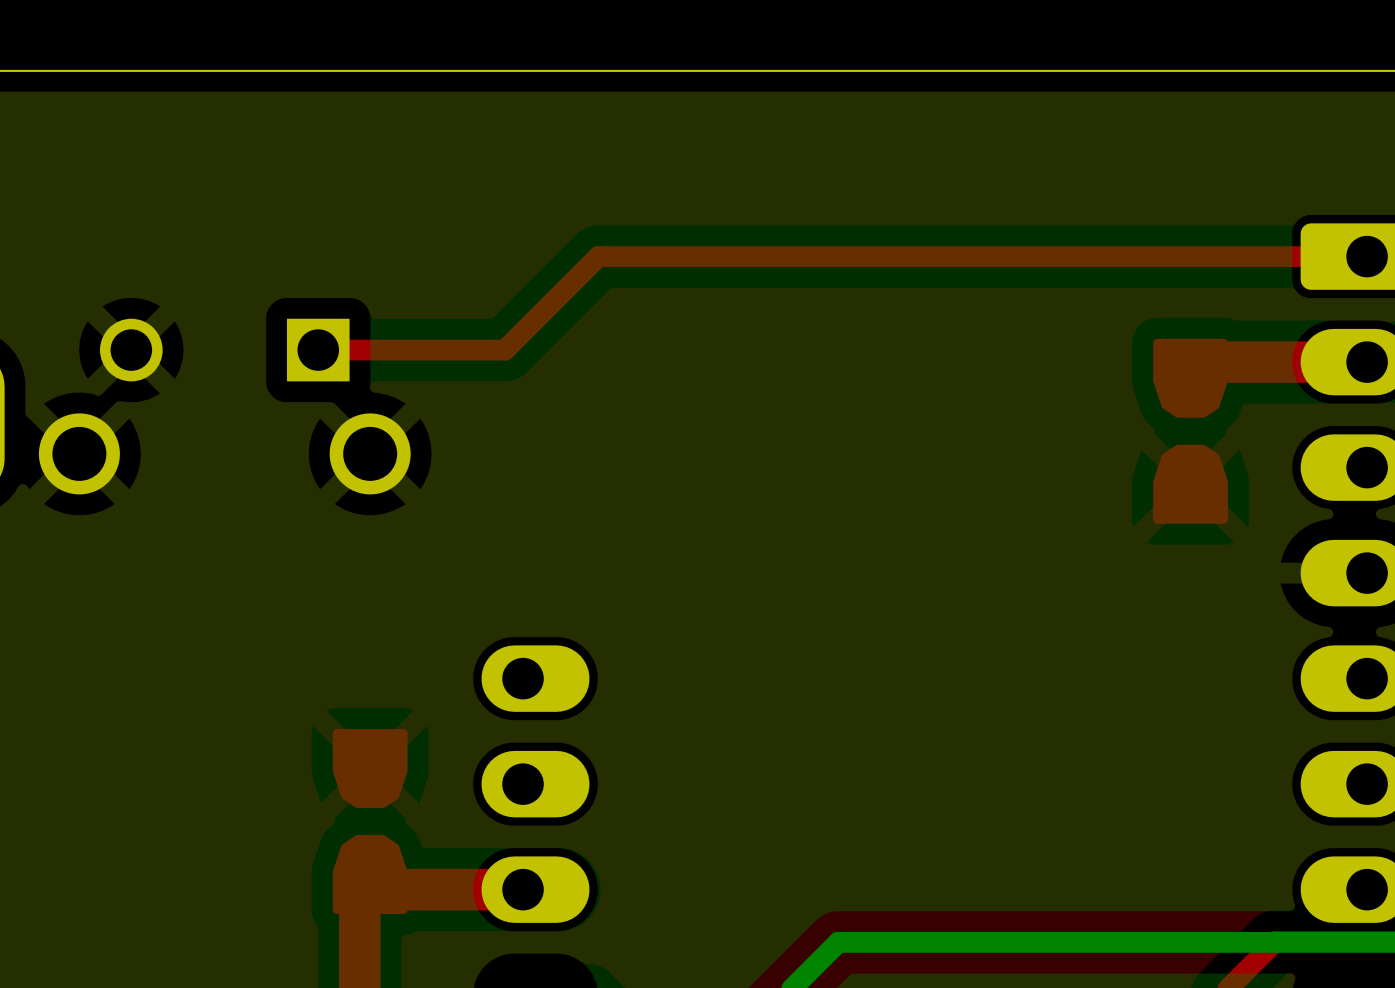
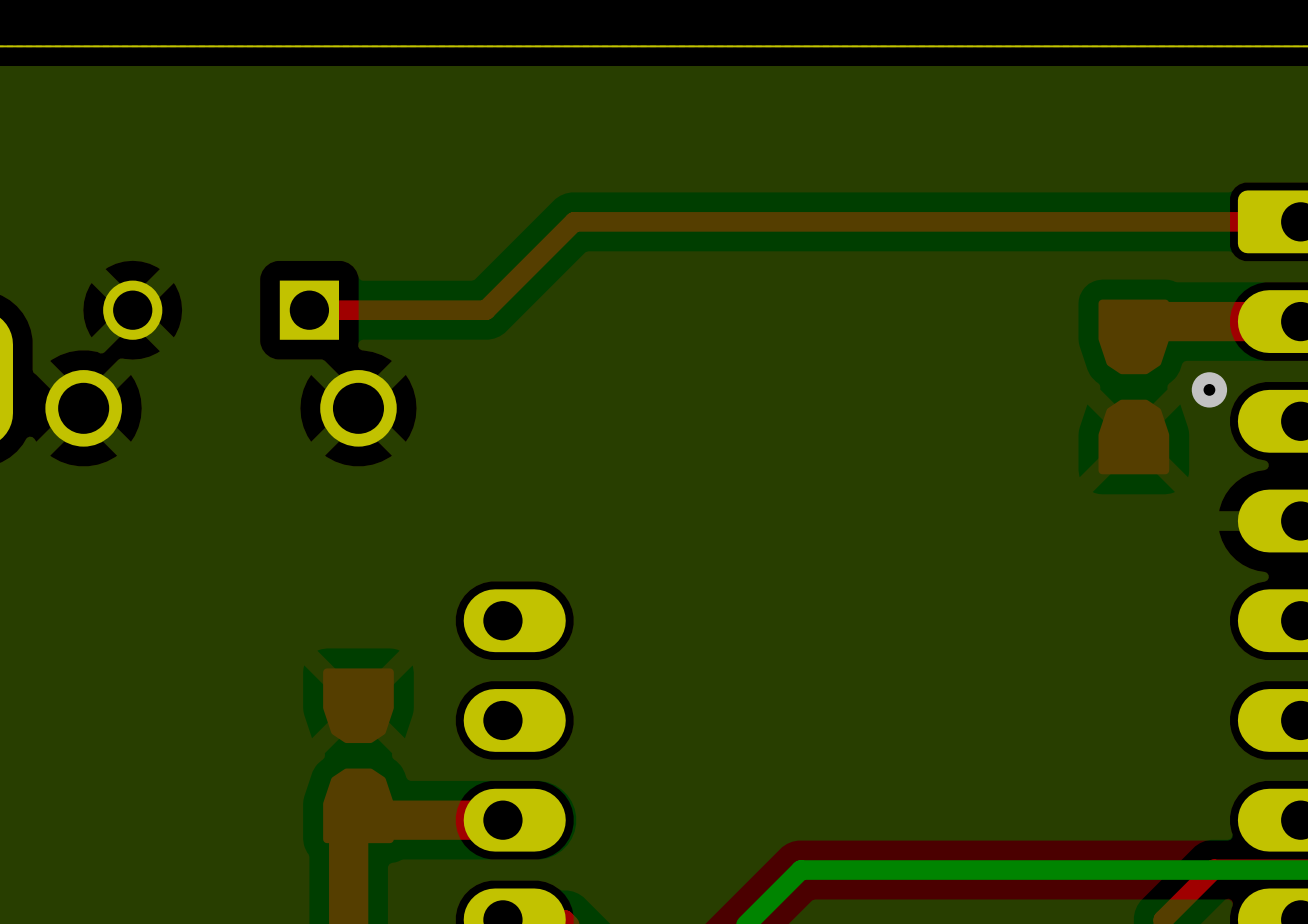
via: none -> (1209, 389)

